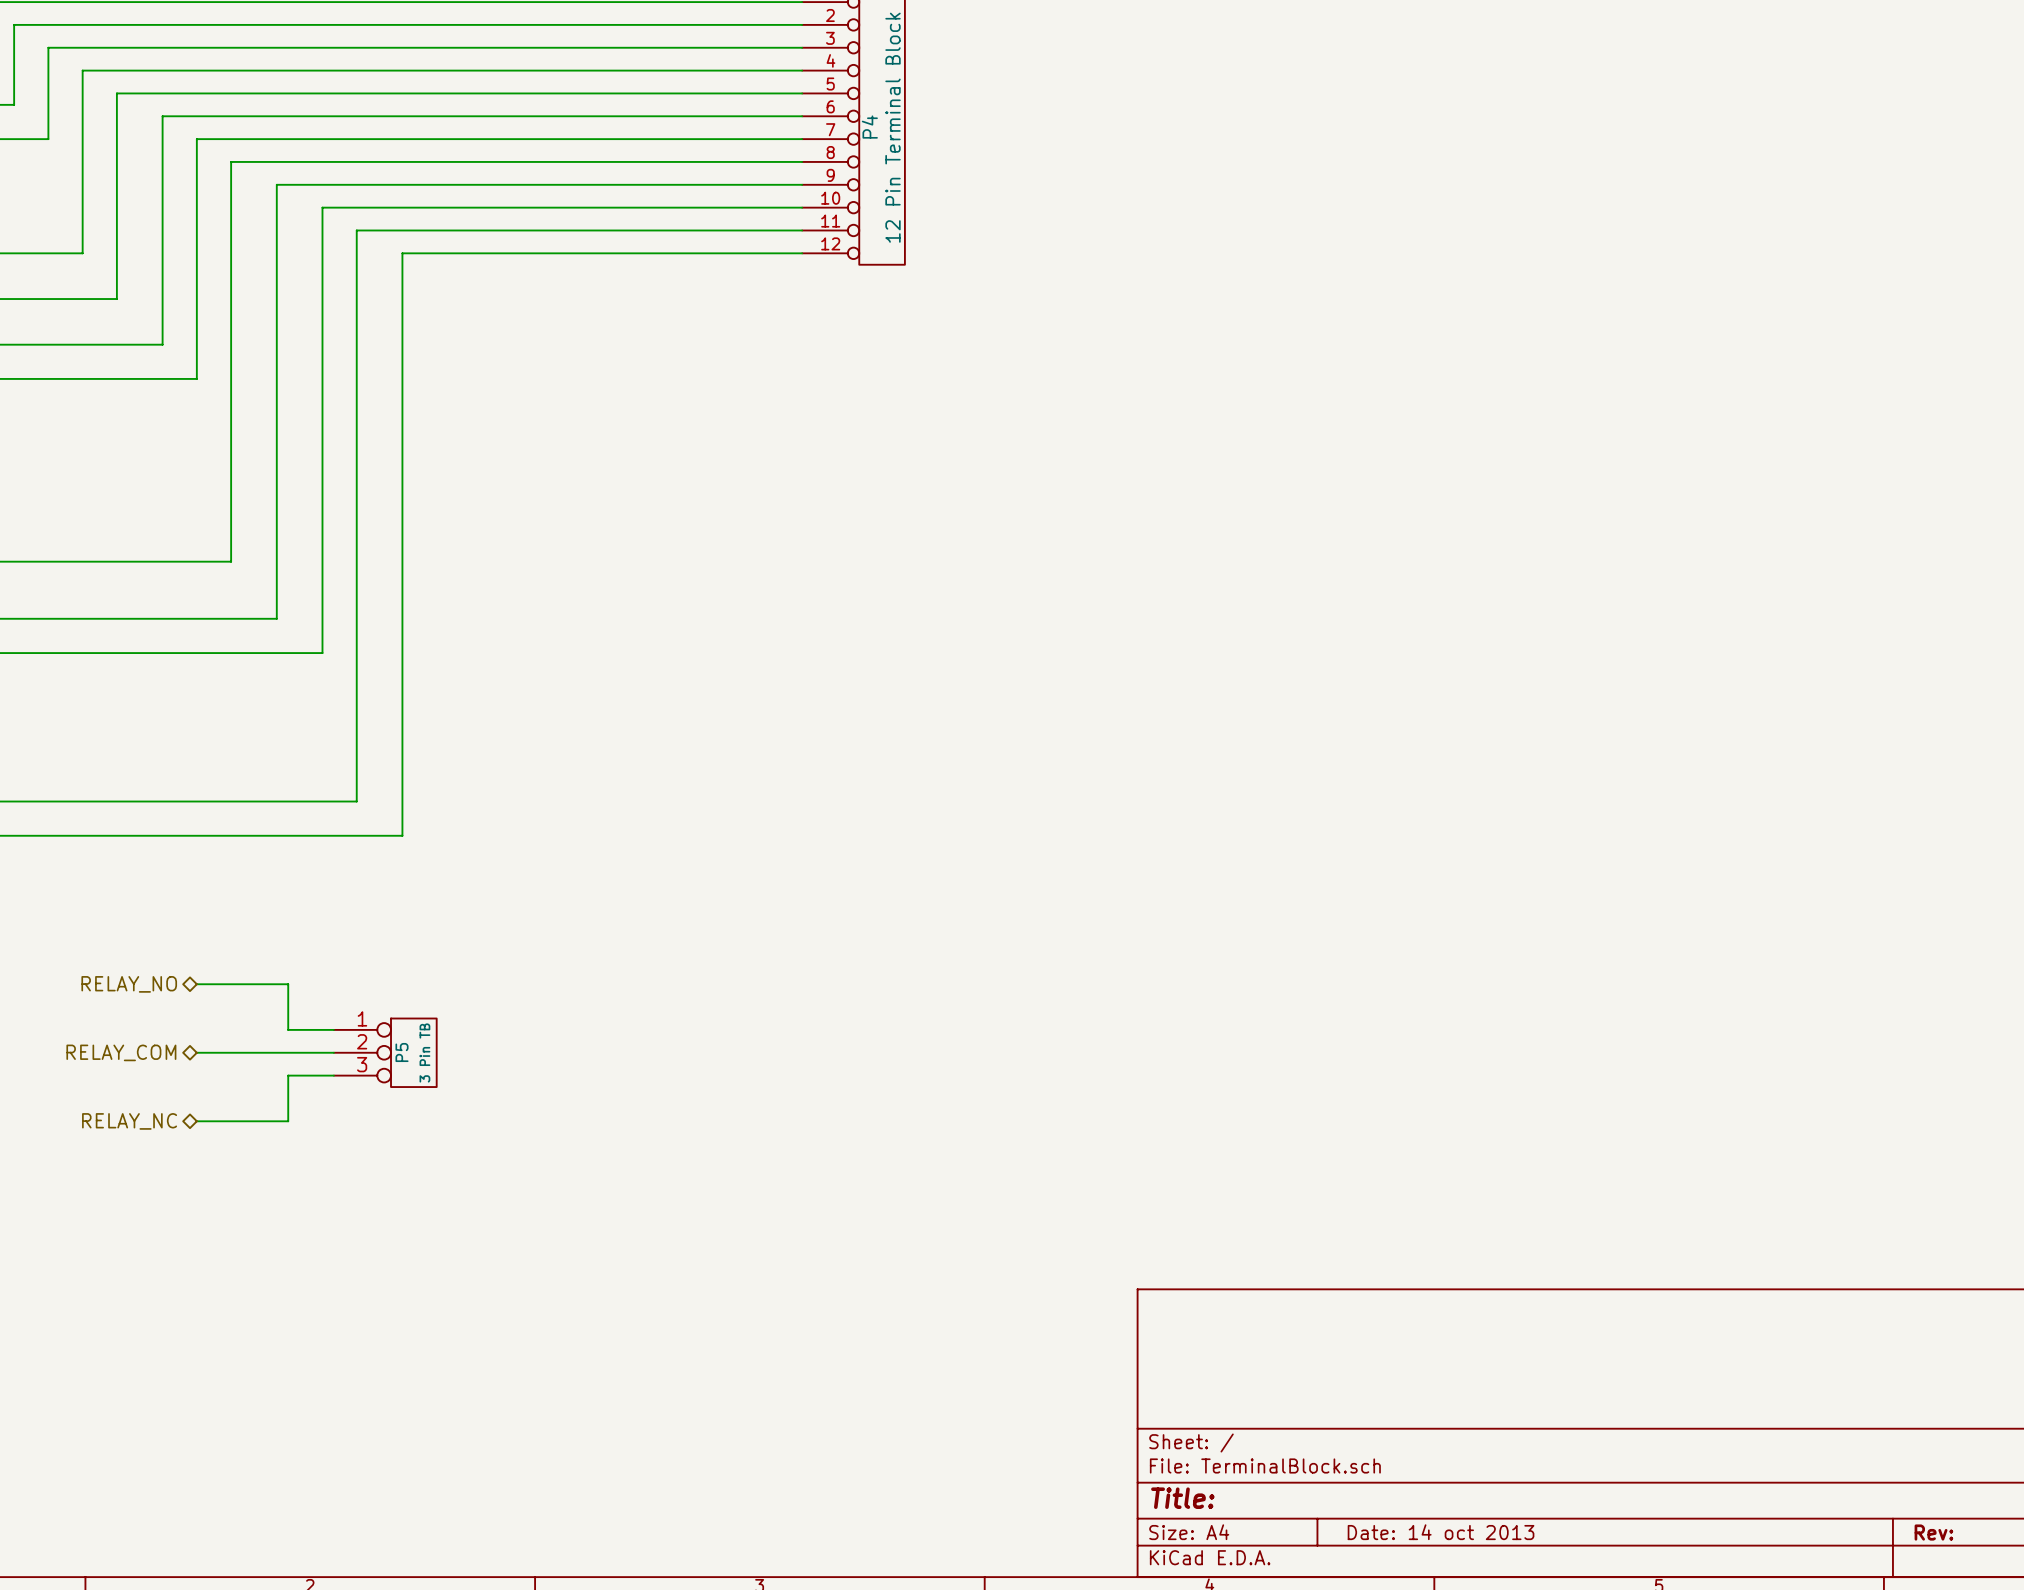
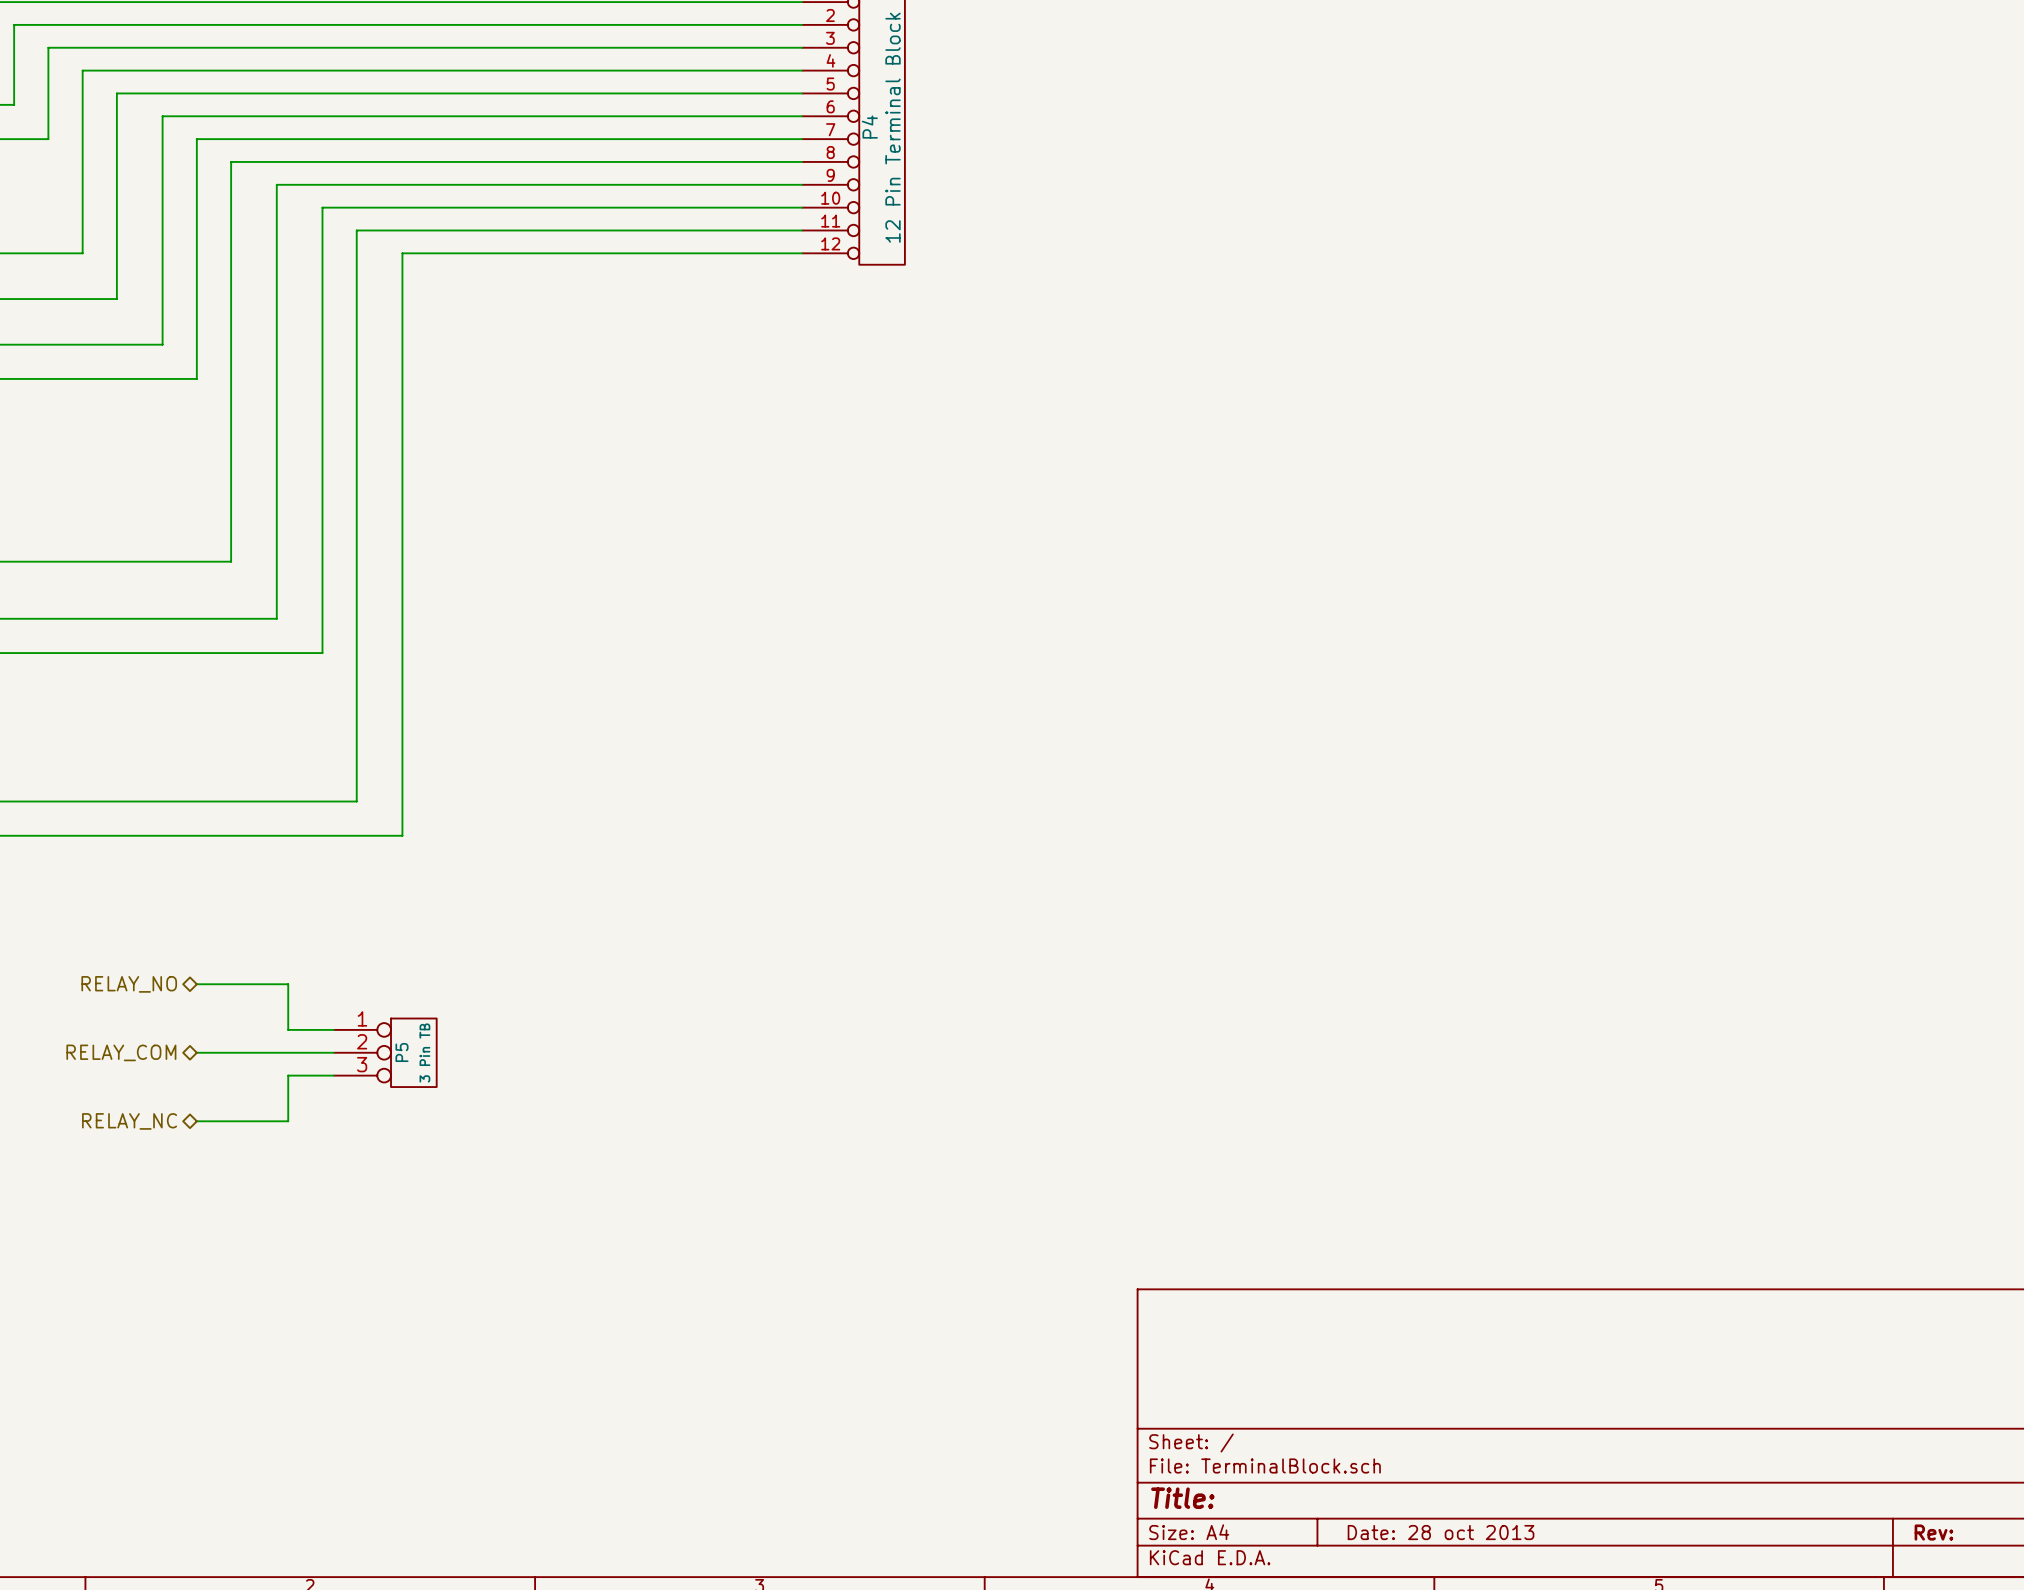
title block: Date: 14 oct 2013 (1441, 1532) -> Date: 28 oct 2013 (1441, 1532)

